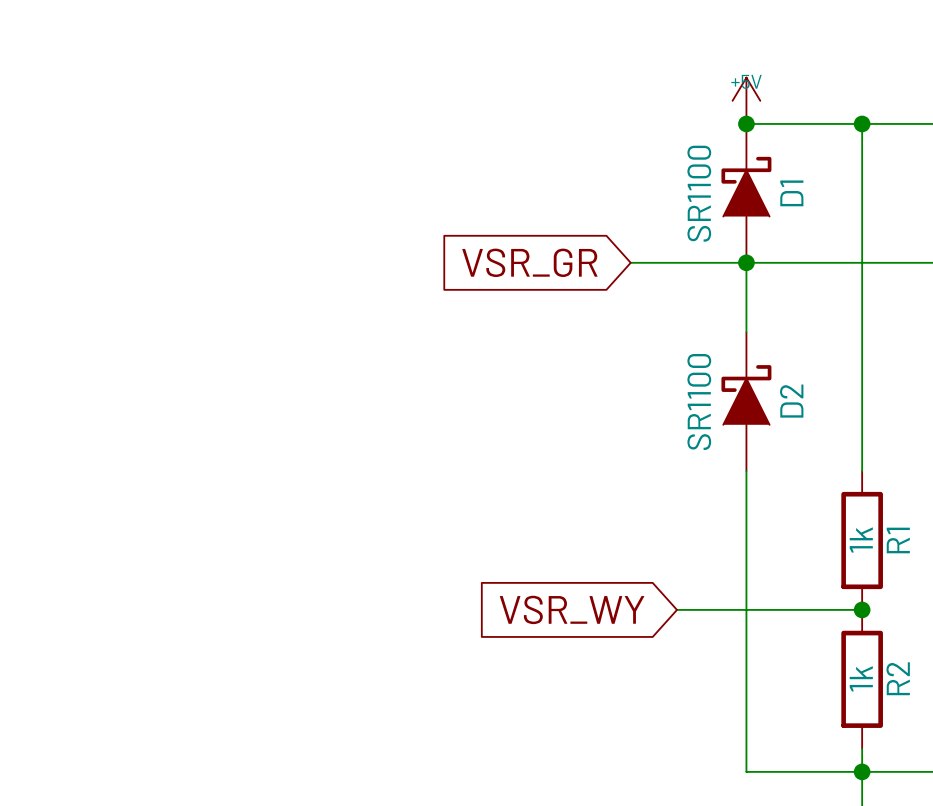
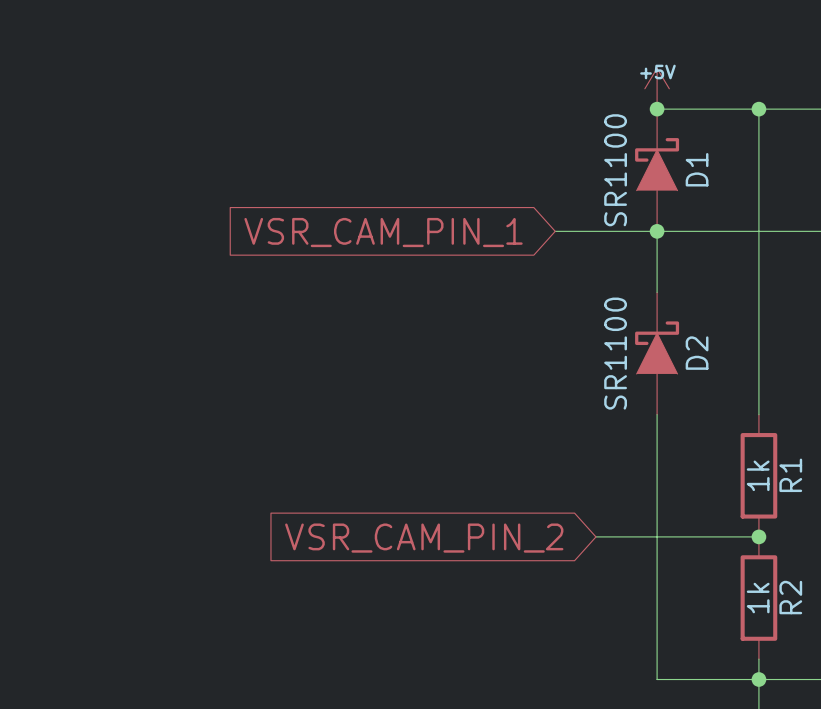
global label: VSR_GR (529, 262) -> VSR_CAM_PIN_1 (383, 232)
global label: VSR_WY (572, 609) -> VSR_CAM_PIN_2 (424, 538)

